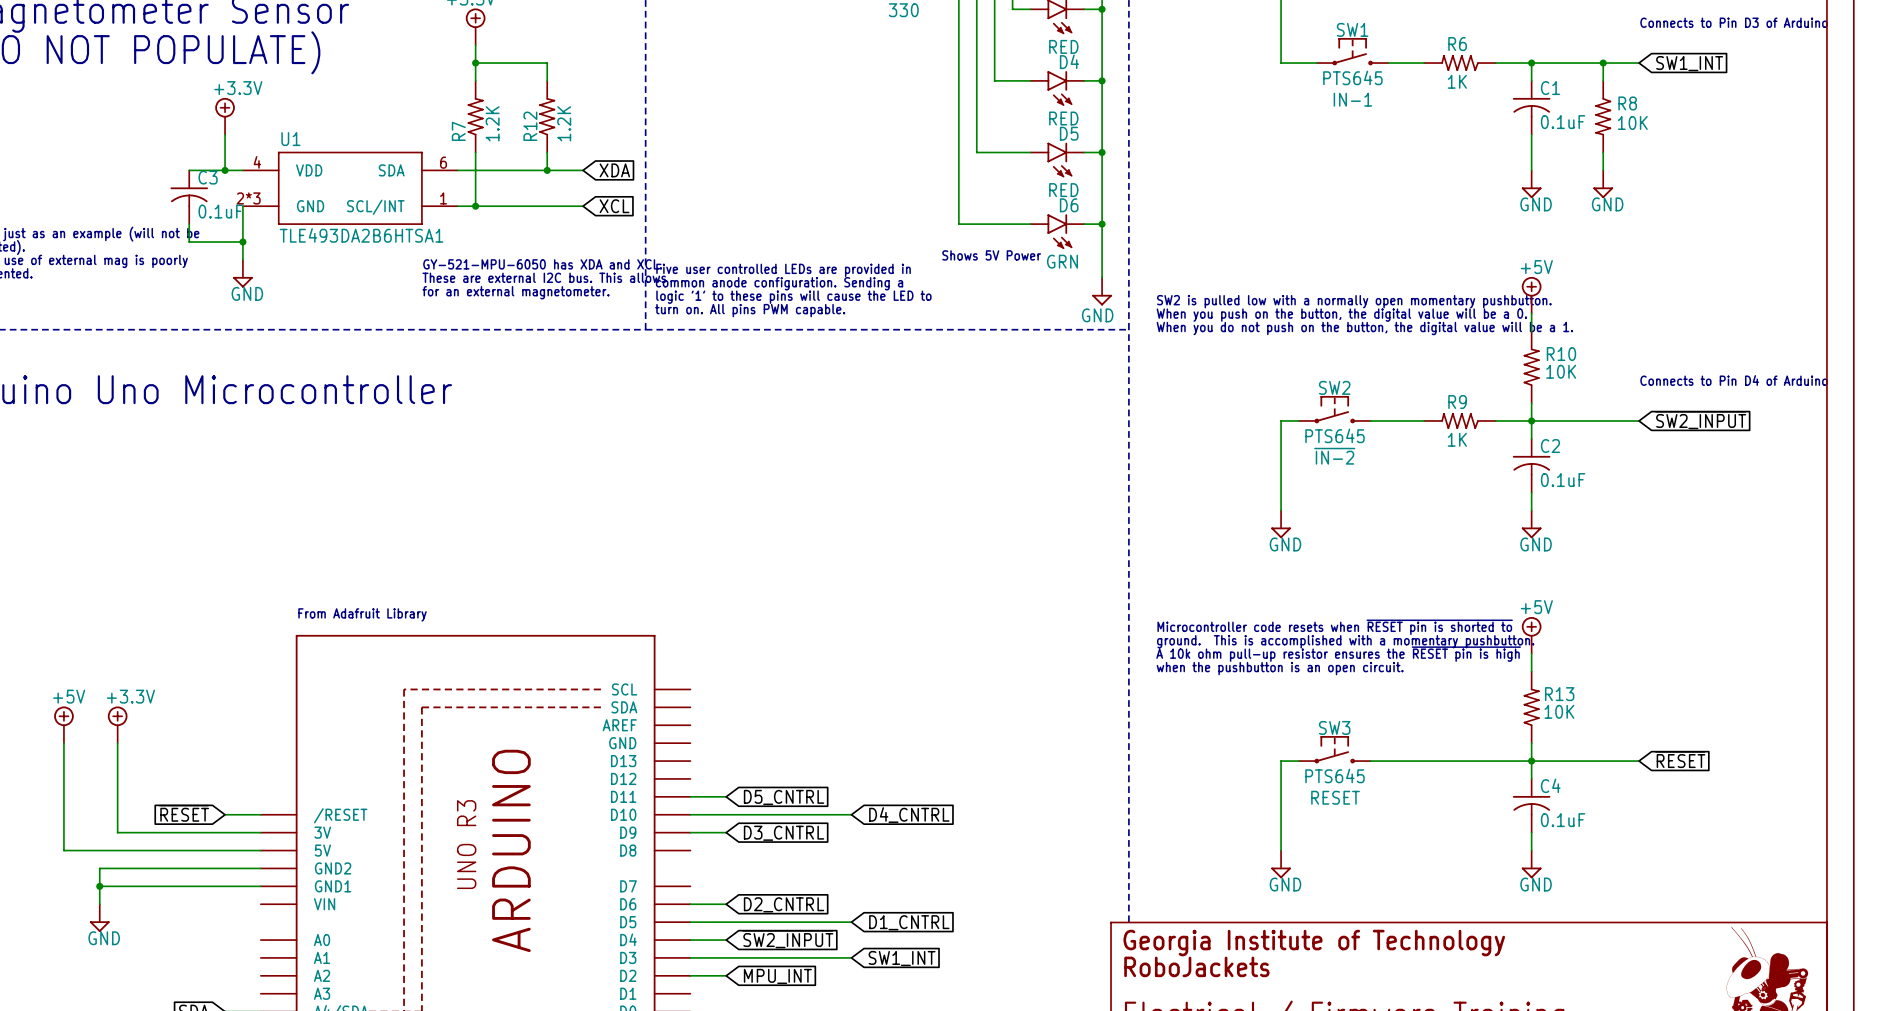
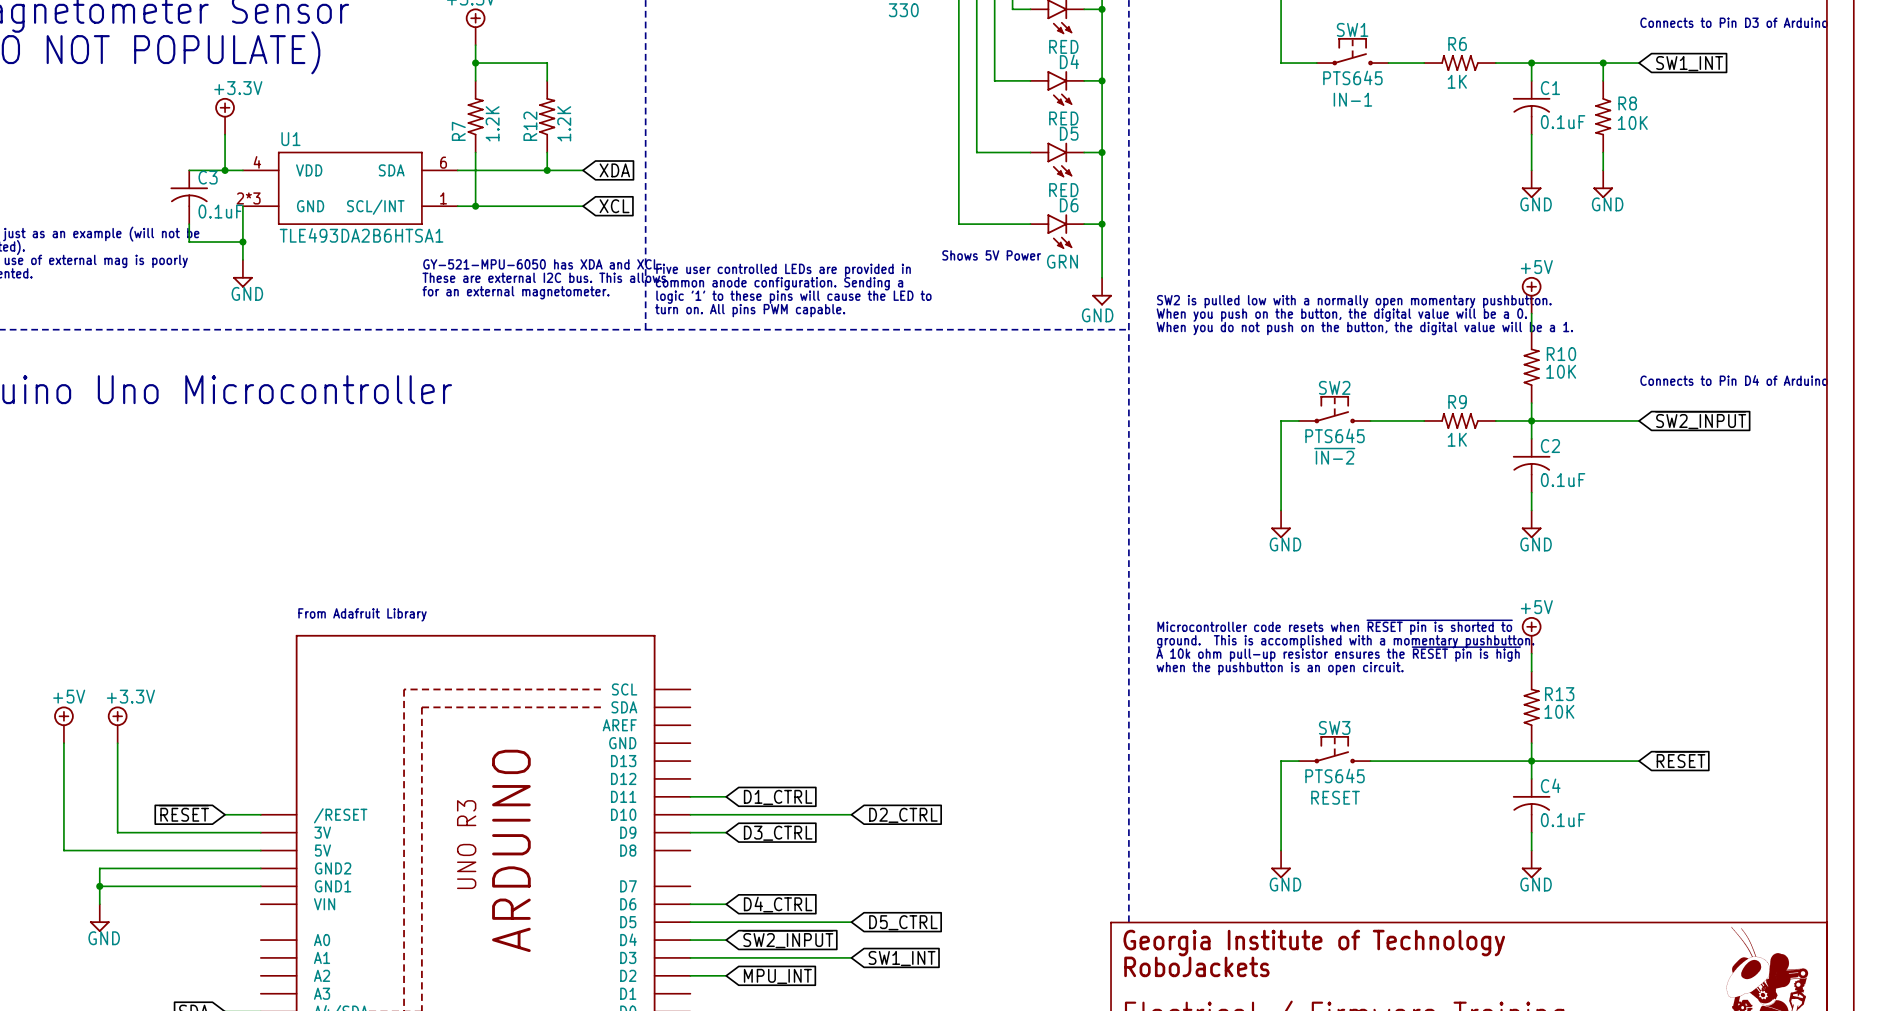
global label: D5_CNTRL (784, 797) -> D1_CTRL (778, 797)
global label: D4_CNTRL (909, 815) -> D2_CTRL (903, 815)
global label: D3_CNTRL (784, 833) -> D3_CTRL (778, 833)
global label: D2_CNTRL (784, 904) -> D4_CTRL (778, 904)
global label: D1_CNTRL (909, 922) -> D5_CTRL (903, 922)

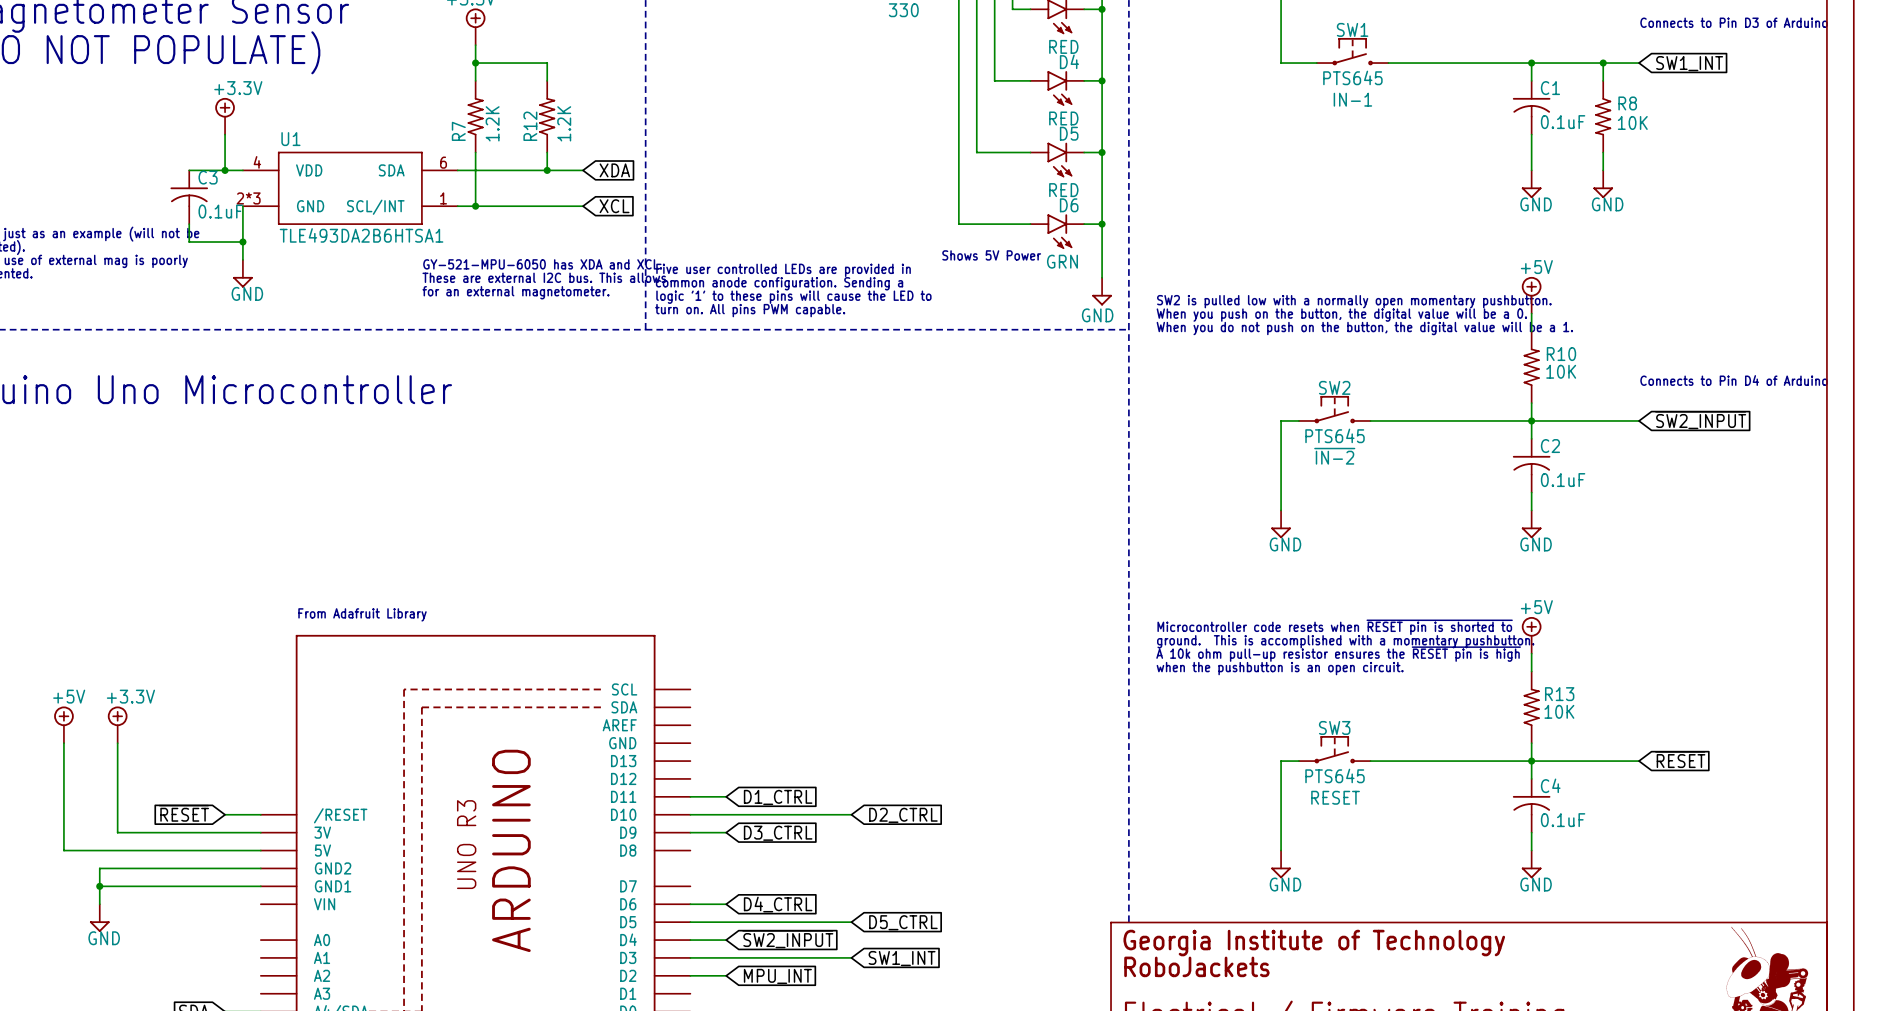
R6: 1K (1460, 63) -> none
R9: 1K (1460, 420) -> none

